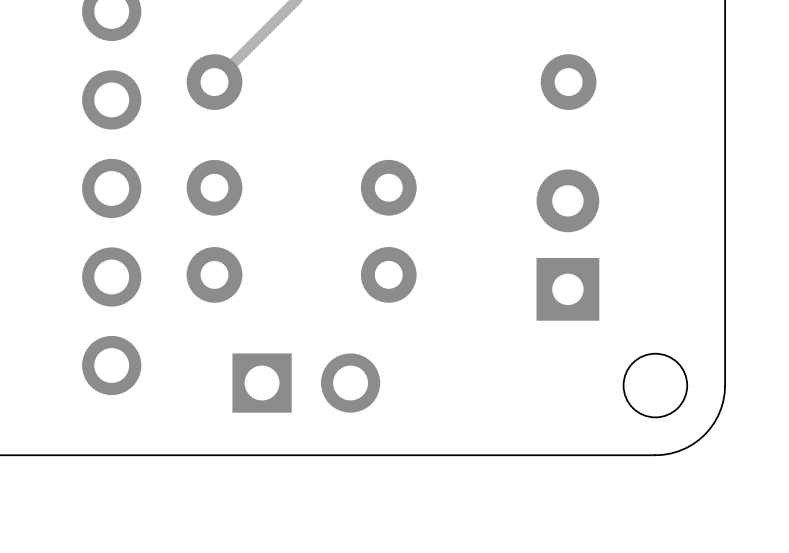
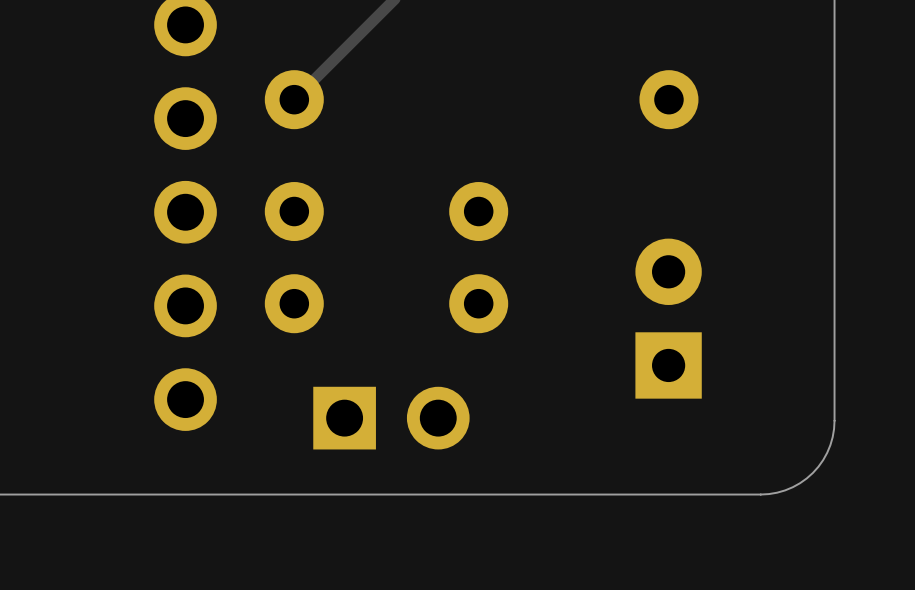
part position: (567, 245) -> (668, 318)
round board edge: [622, 352, 689, 419] -> none

